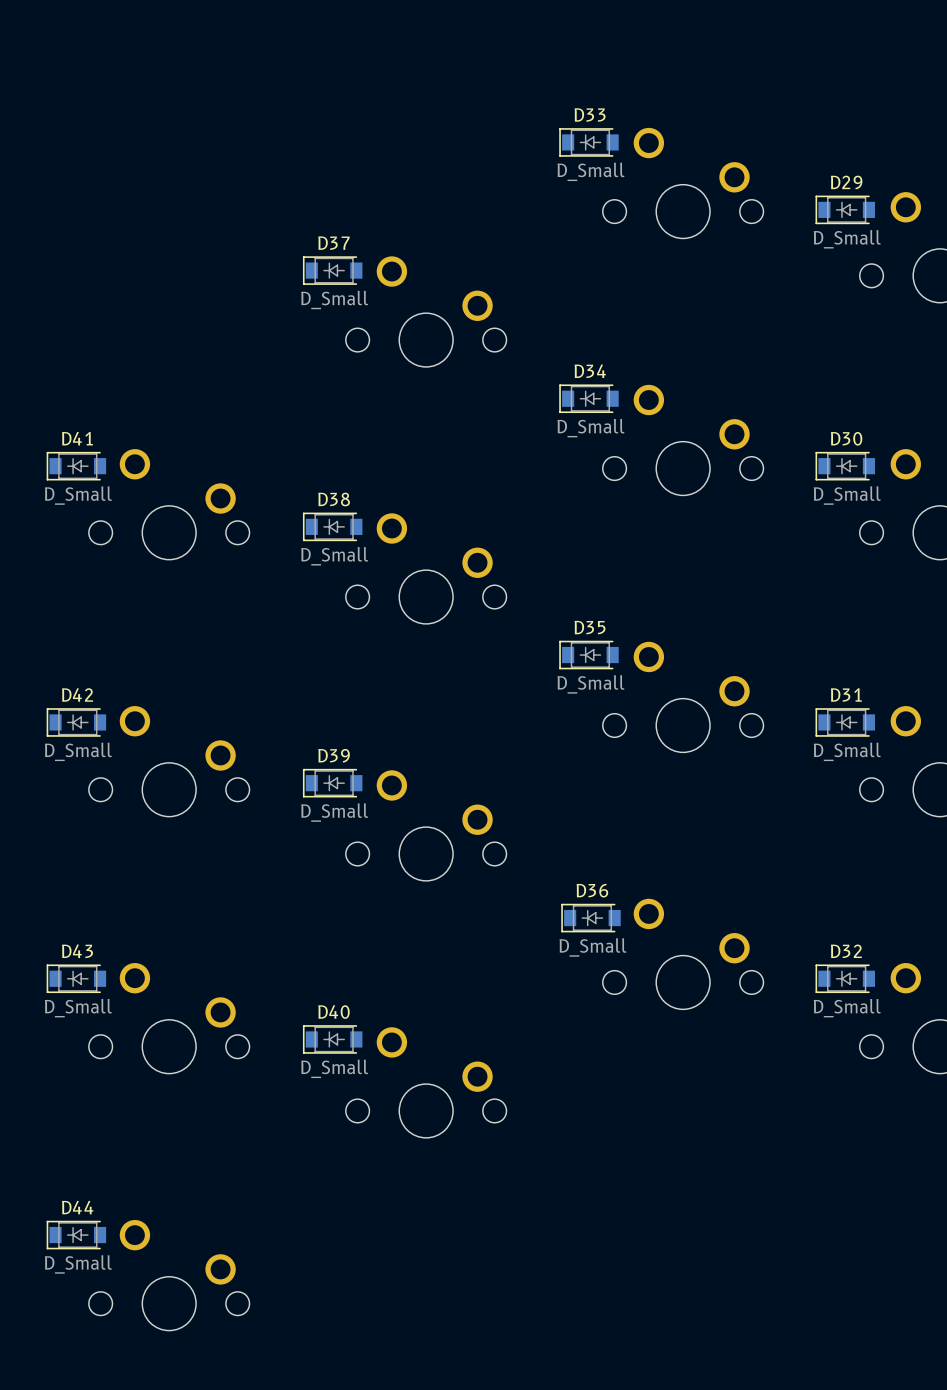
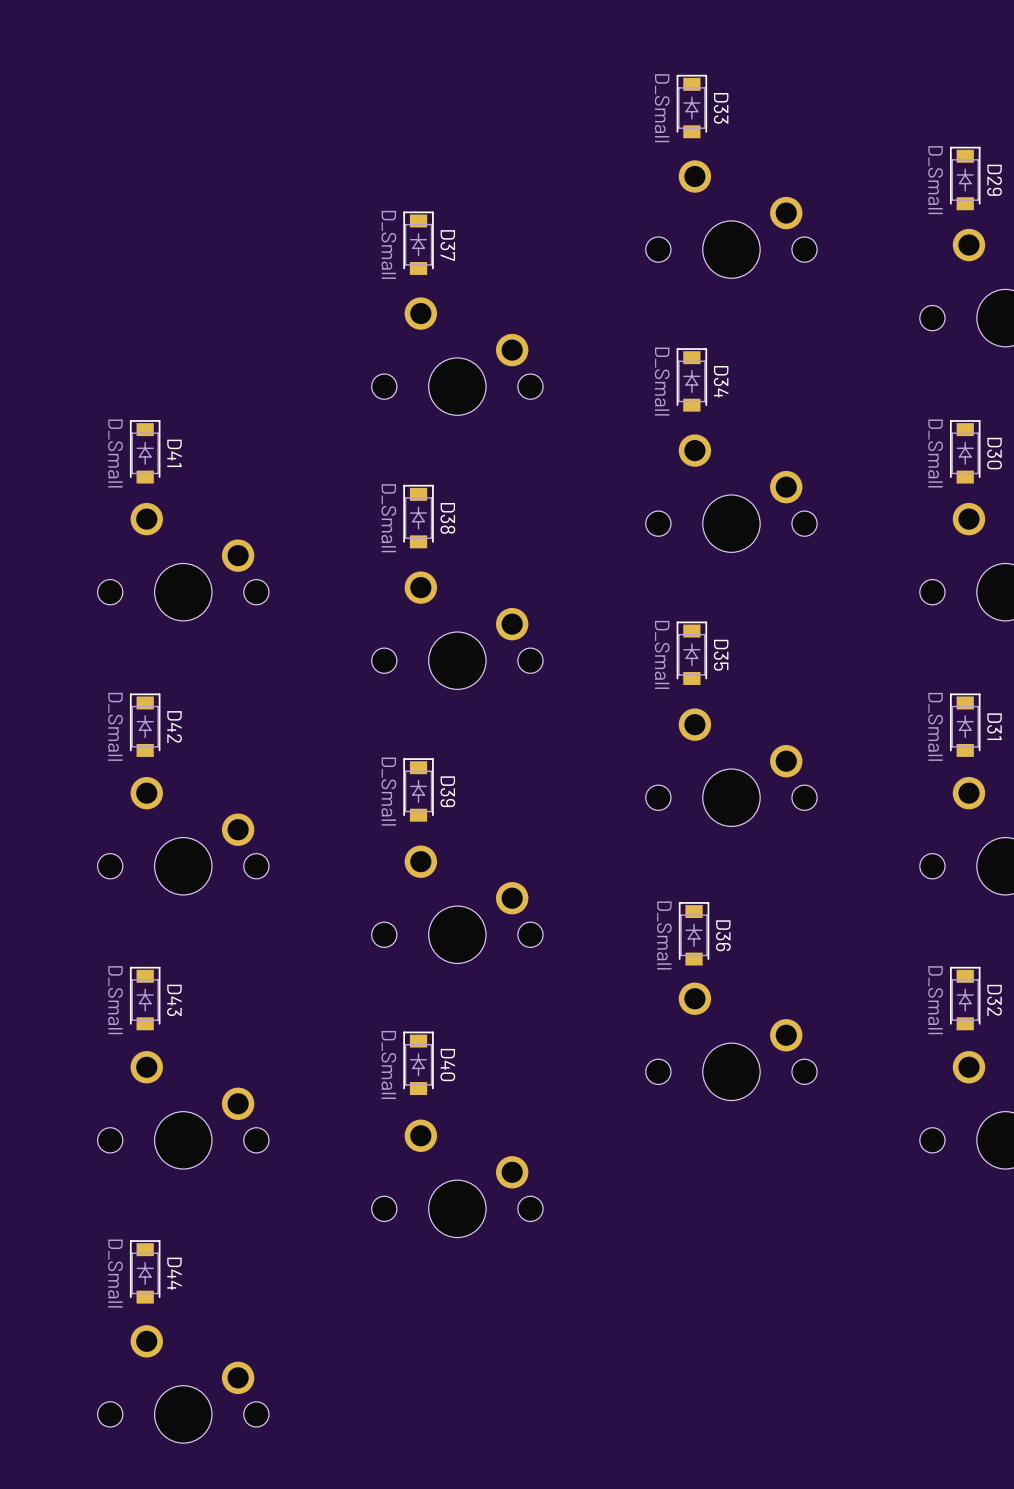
D33 rotation: 0° (588, 142) -> 90° clockwise (691, 106)
D33 position: (588, 142) -> (691, 106)
D29 rotation: 0° (845, 209) -> 90° clockwise (965, 178)
D29 position: (845, 209) -> (965, 178)
D37 rotation: 0° (332, 270) -> 90° clockwise (418, 243)
D37 position: (332, 270) -> (418, 243)
D34 rotation: 0° (588, 398) -> 90° clockwise (691, 379)
D34 position: (588, 398) -> (691, 379)
D41 rotation: 0° (76, 466) -> 90° clockwise (145, 451)
D41 position: (76, 466) -> (145, 451)
D30 rotation: 0° (845, 466) -> 90° clockwise (965, 451)
D30 position: (845, 466) -> (965, 451)
D38 rotation: 0° (332, 526) -> 90° clockwise (418, 516)
D38 position: (332, 526) -> (418, 516)
D35 rotation: 0° (588, 655) -> 90° clockwise (691, 653)
D35 position: (588, 655) -> (691, 653)
D42 rotation: 0° (76, 722) -> 90° clockwise (145, 725)
D42 position: (76, 722) -> (145, 725)
D31 rotation: 0° (845, 722) -> 90° clockwise (965, 725)
D31 position: (845, 722) -> (965, 725)
D39 rotation: 0° (332, 783) -> 90° clockwise (418, 789)
D39 position: (332, 783) -> (418, 789)
D36 rotation: 0° (590, 918) -> 90° clockwise (694, 933)
D36 position: (590, 918) -> (694, 933)
D43 rotation: 0° (76, 978) -> 90° clockwise (145, 998)
D43 position: (76, 978) -> (145, 998)
D32 rotation: 0° (845, 978) -> 90° clockwise (965, 998)
D32 position: (845, 978) -> (965, 998)
D40 rotation: 0° (332, 1039) -> 90° clockwise (418, 1063)
D40 position: (332, 1039) -> (418, 1063)
D44 rotation: 0° (76, 1235) -> 90° clockwise (145, 1271)
D44 position: (76, 1235) -> (145, 1271)

